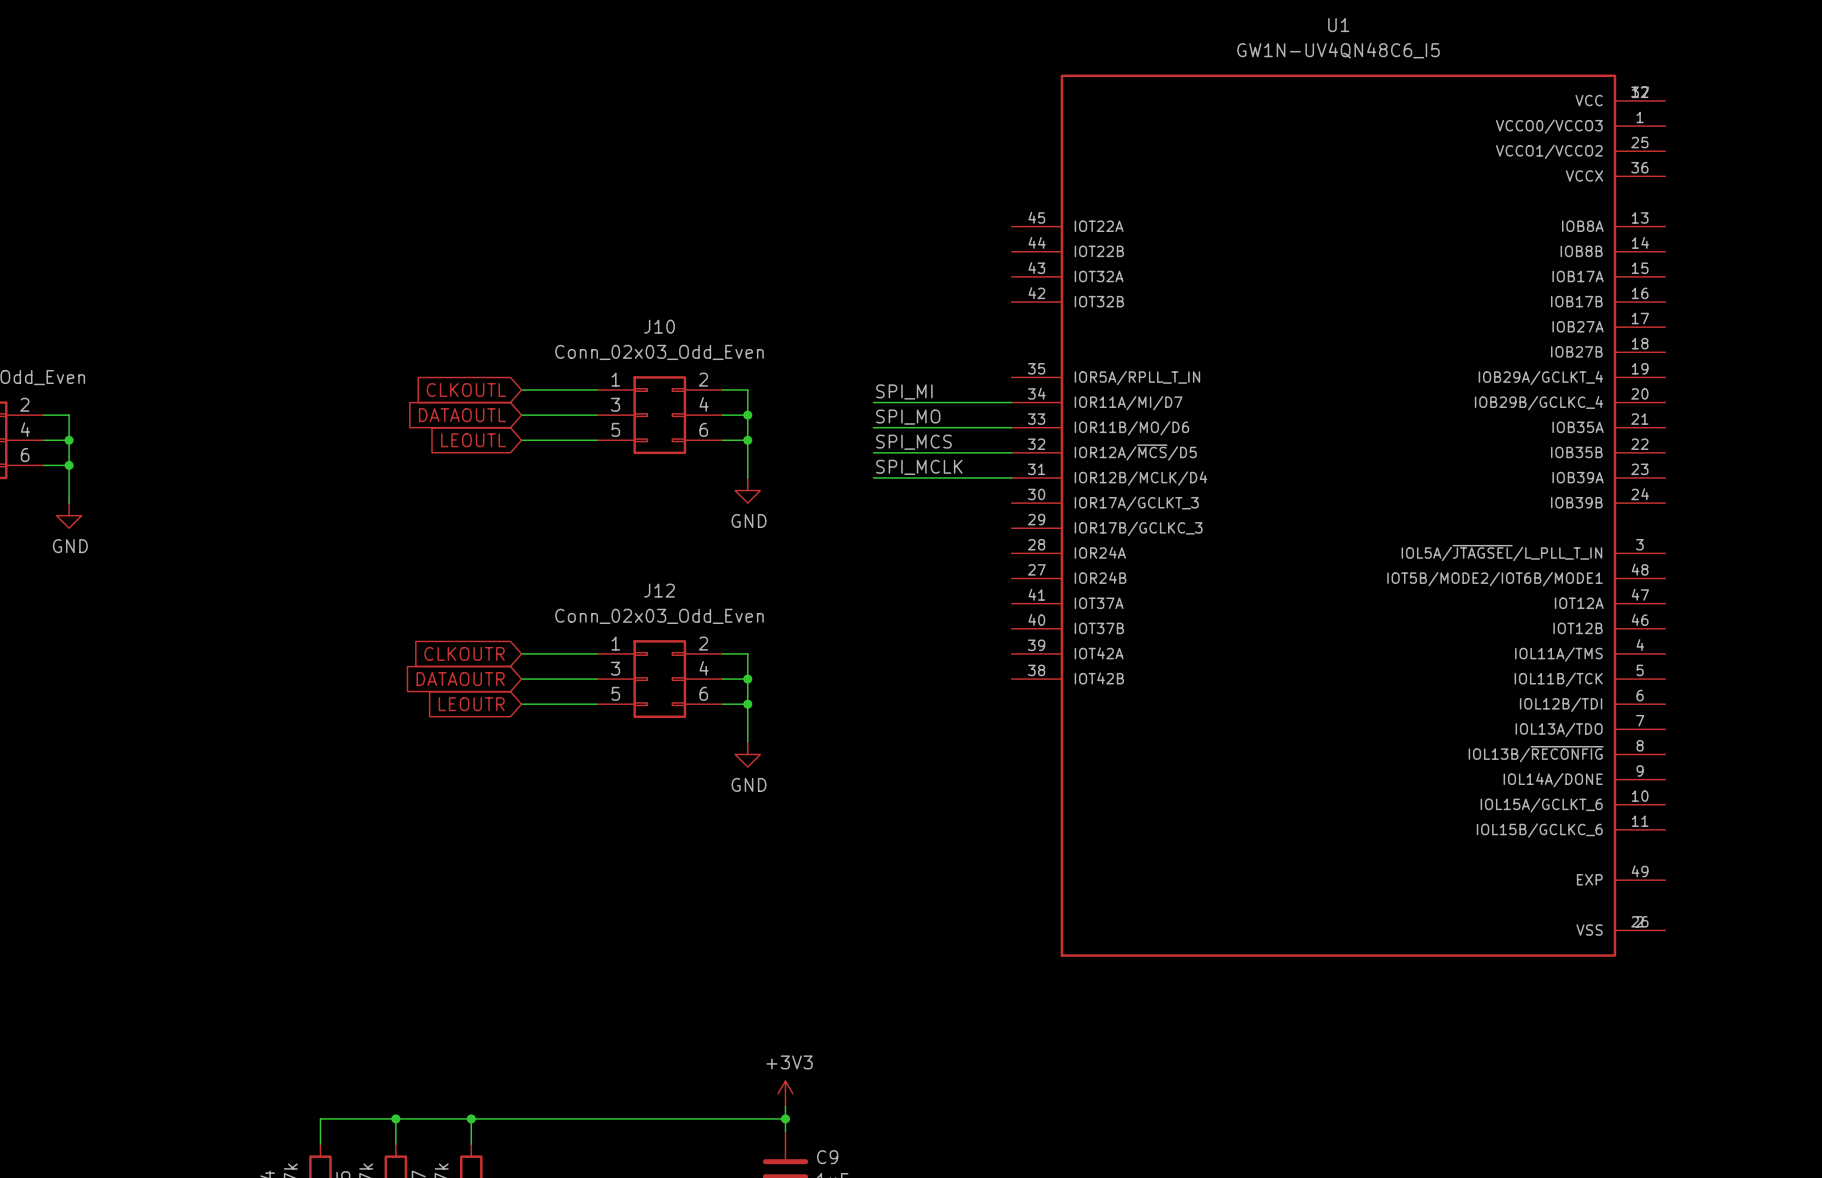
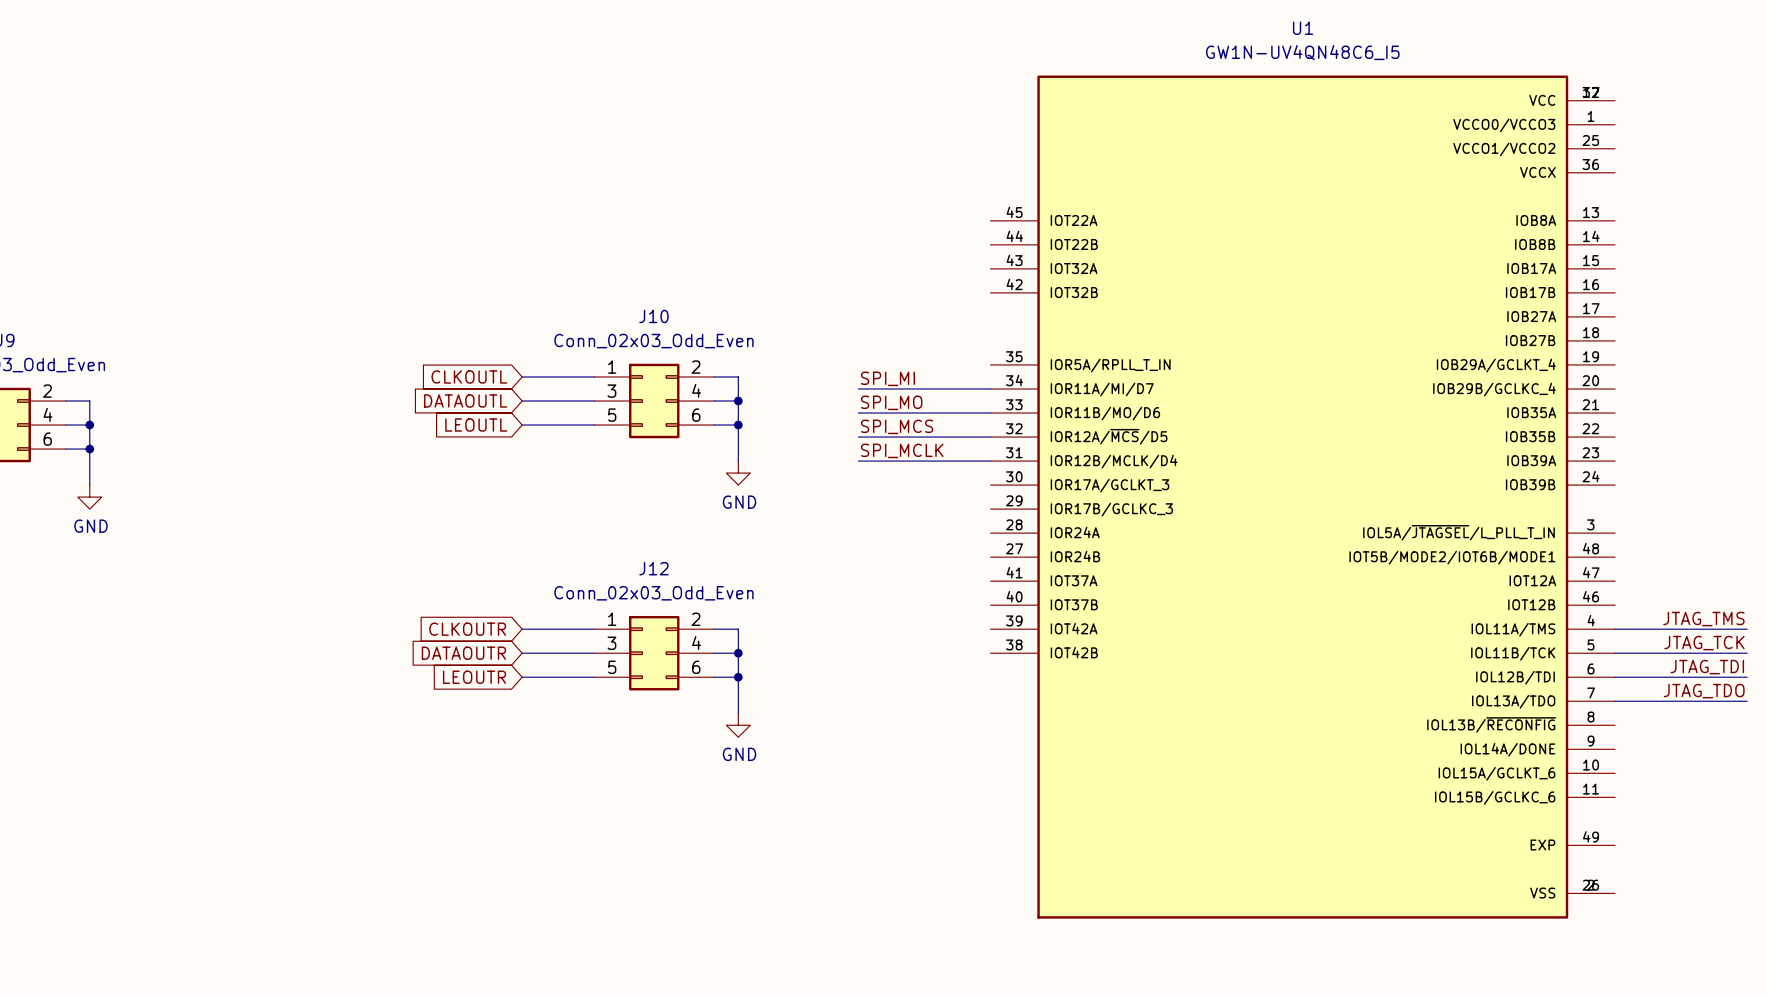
label: none -> JTAG_TMS (1703, 619)
wire: none -> (1615, 629) (1747, 629)
label: none -> JTAG_TCK (1704, 643)
wire: none -> (1615, 653) (1747, 653)
label: none -> JTAG_TDI (1707, 667)
wire: none -> (1615, 677) (1747, 677)
label: none -> JTAG_TDO (1704, 691)
wire: none -> (1615, 701) (1747, 701)

